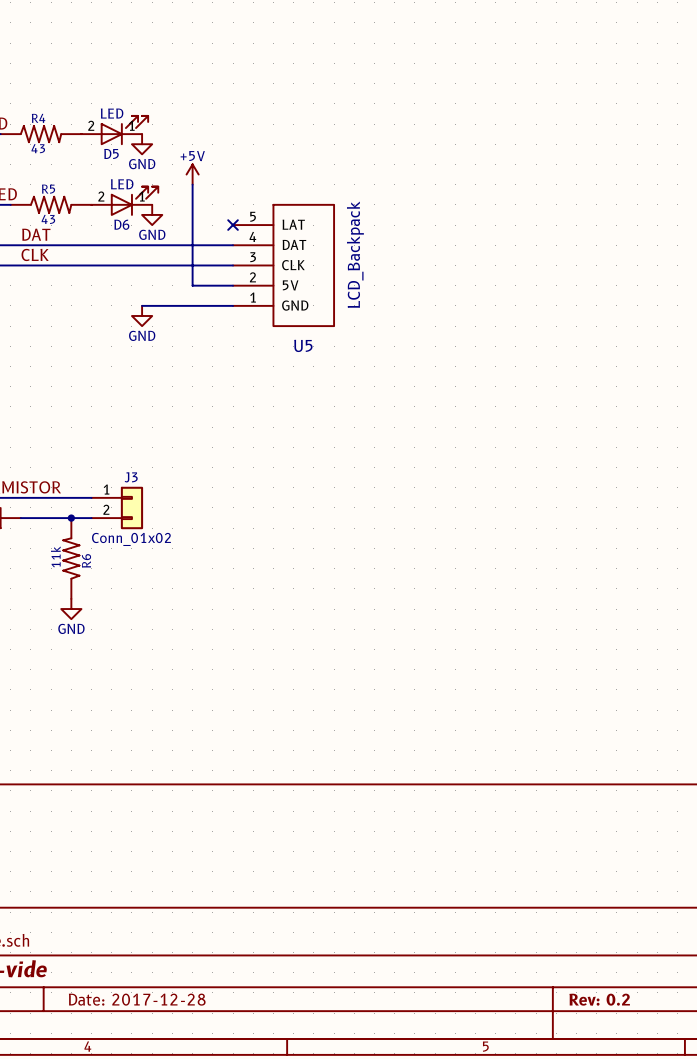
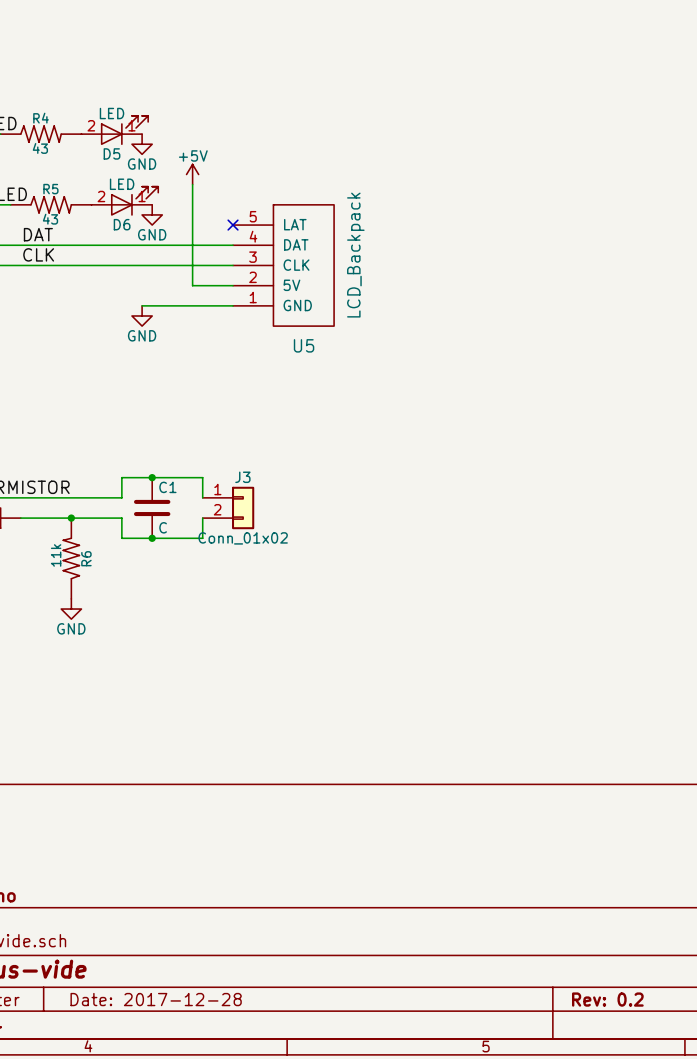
junction: none -> (152, 477)
wire: none -> (91, 497) (121, 497) (121, 477) (202, 477) (202, 497)
J3 position: (117, 507) -> (228, 507)
C1: none -> C (152, 507)
wire: none -> (91, 518) (121, 518) (121, 538) (202, 538) (202, 518)
junction: none -> (152, 538)

